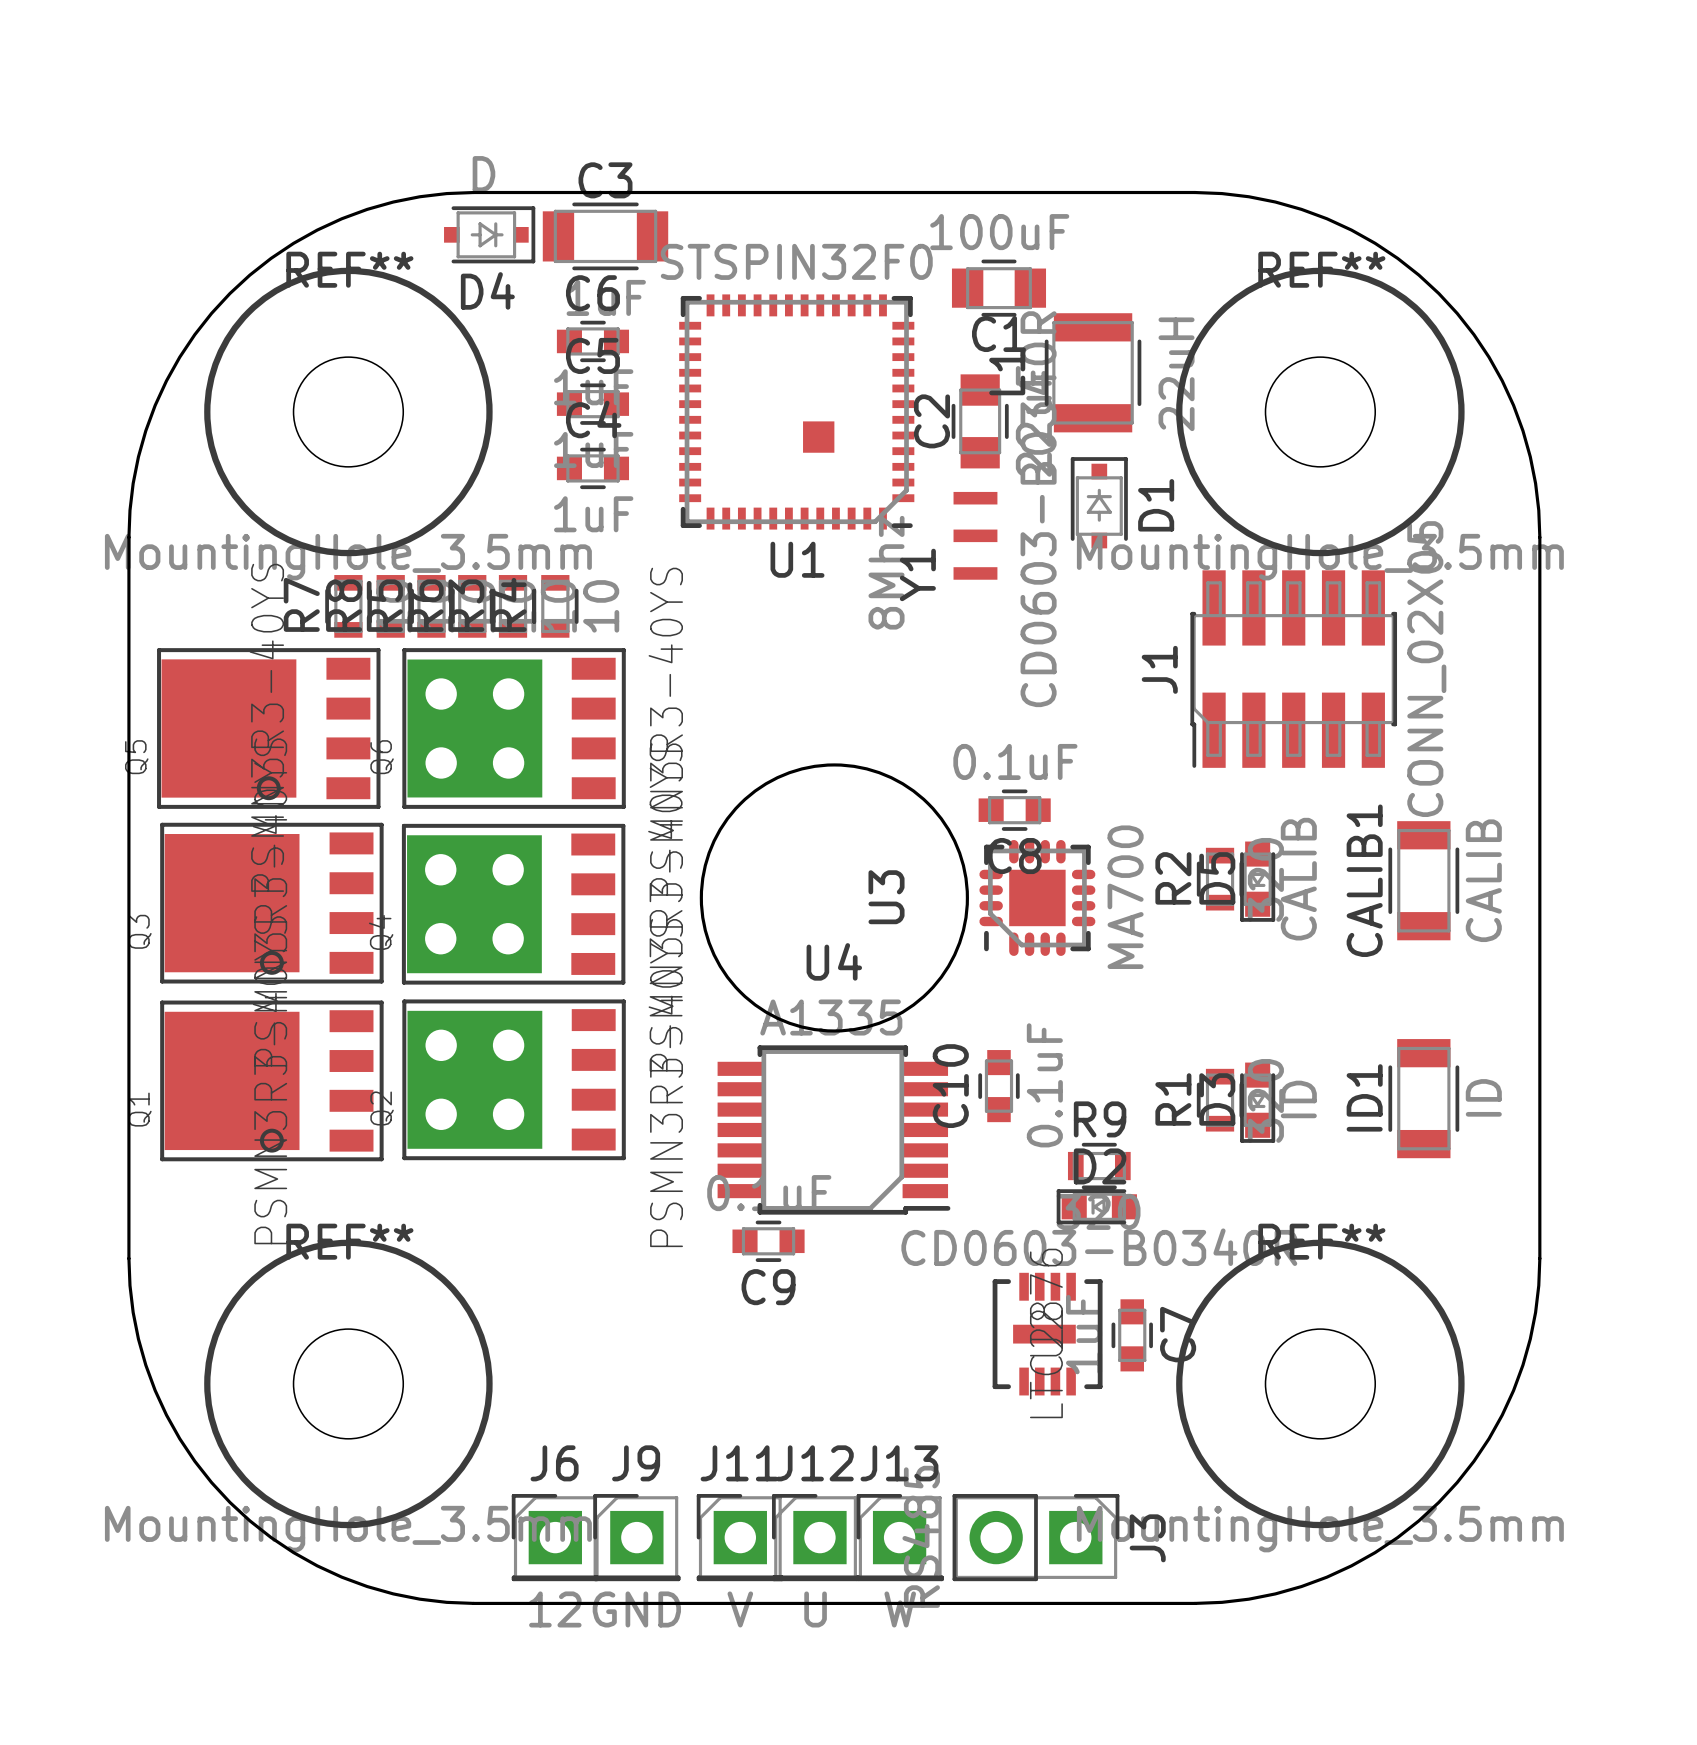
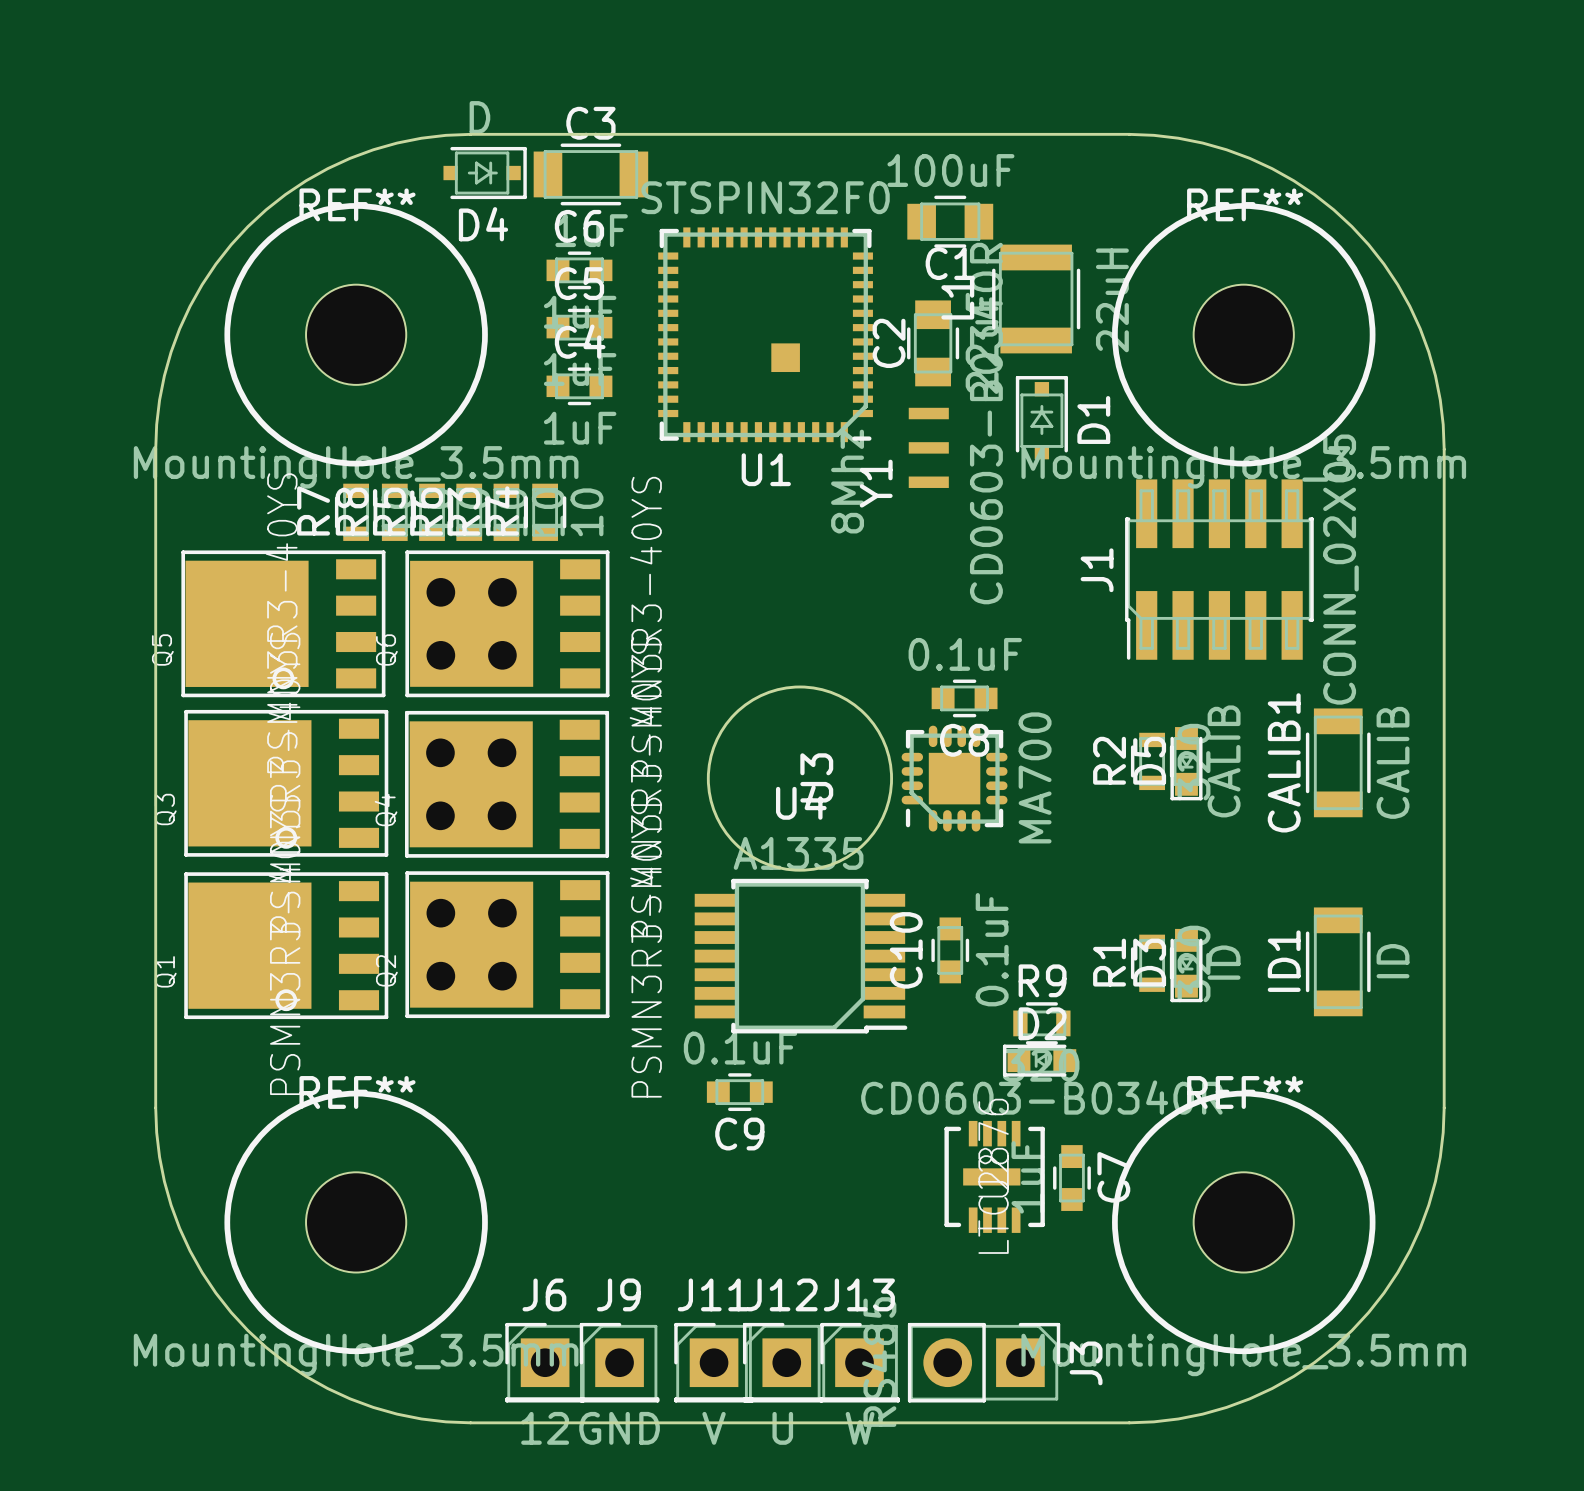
round board edge size: [699, 763, 969, 1033] -> [706, 685, 894, 872]
U3 position: (1037, 897) -> (954, 778)
U4 position: (833, 1129) -> (801, 956)

